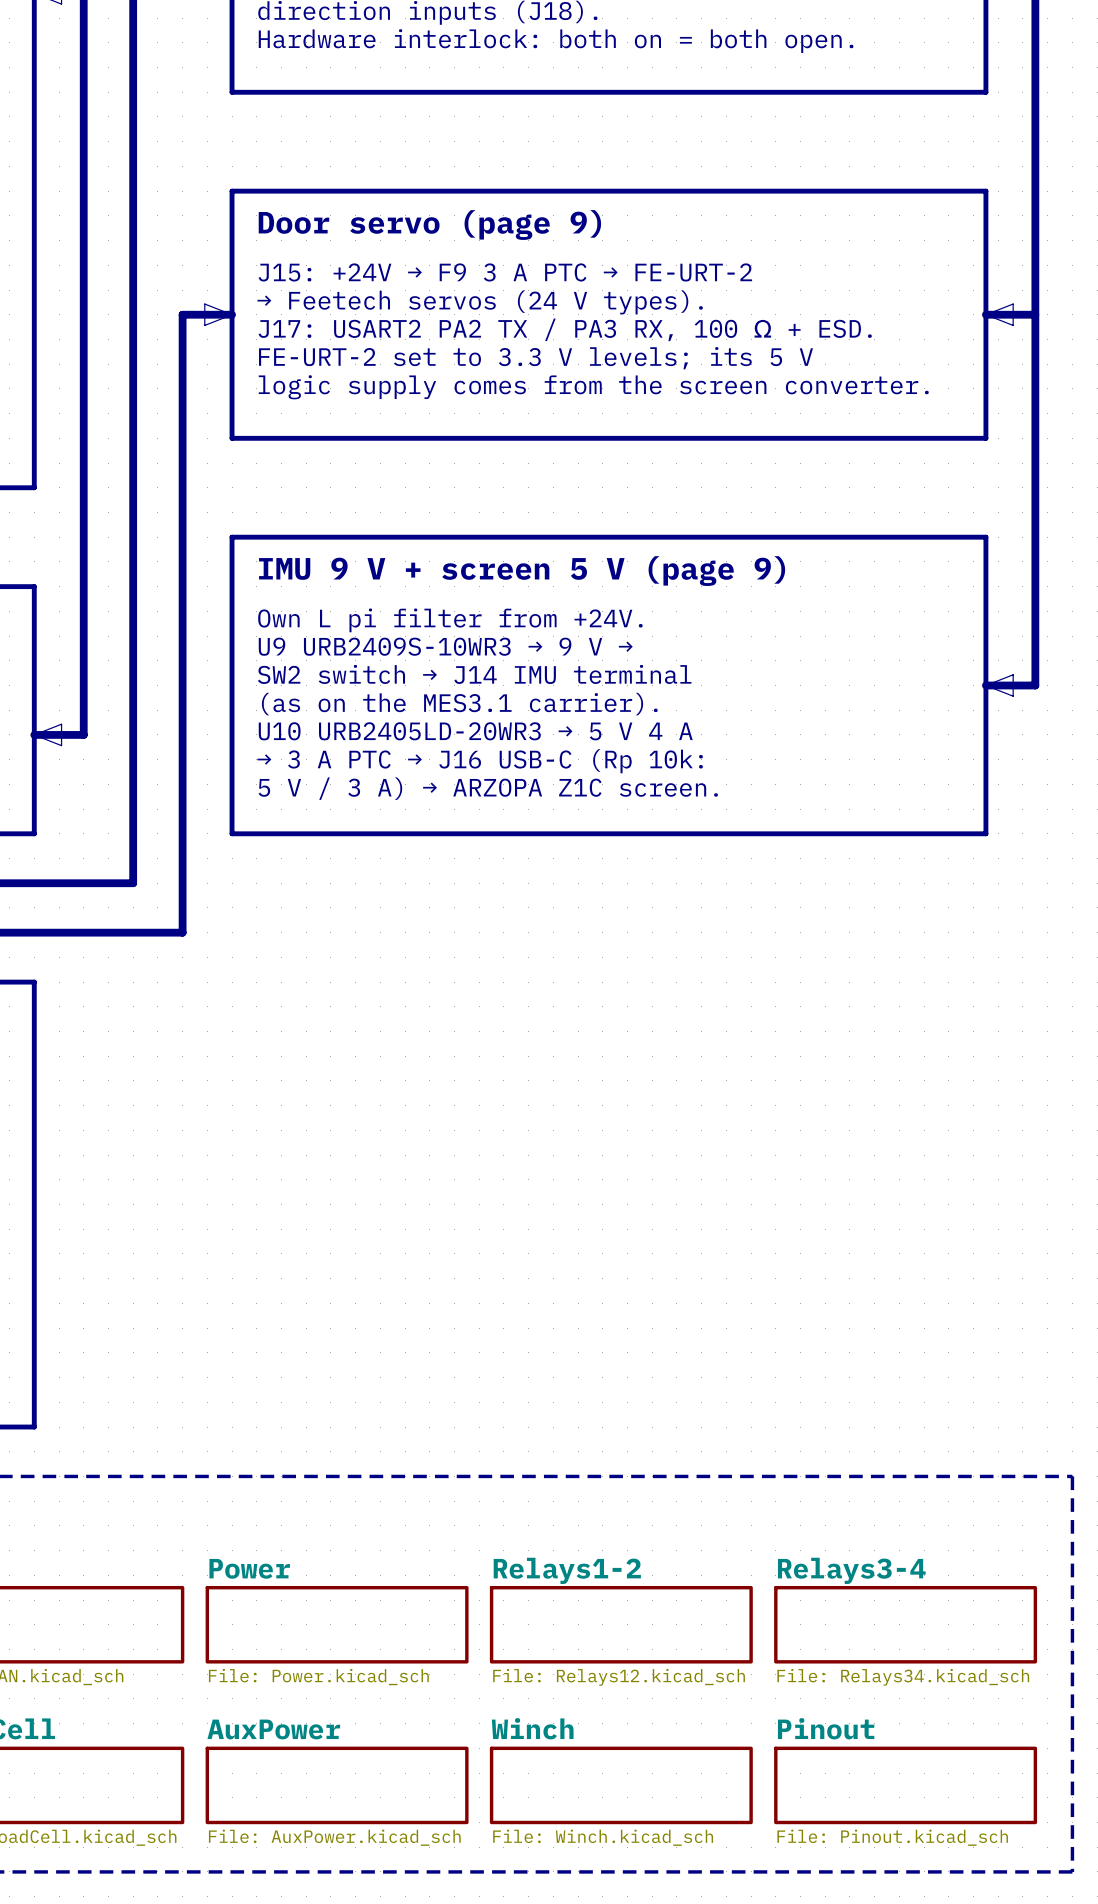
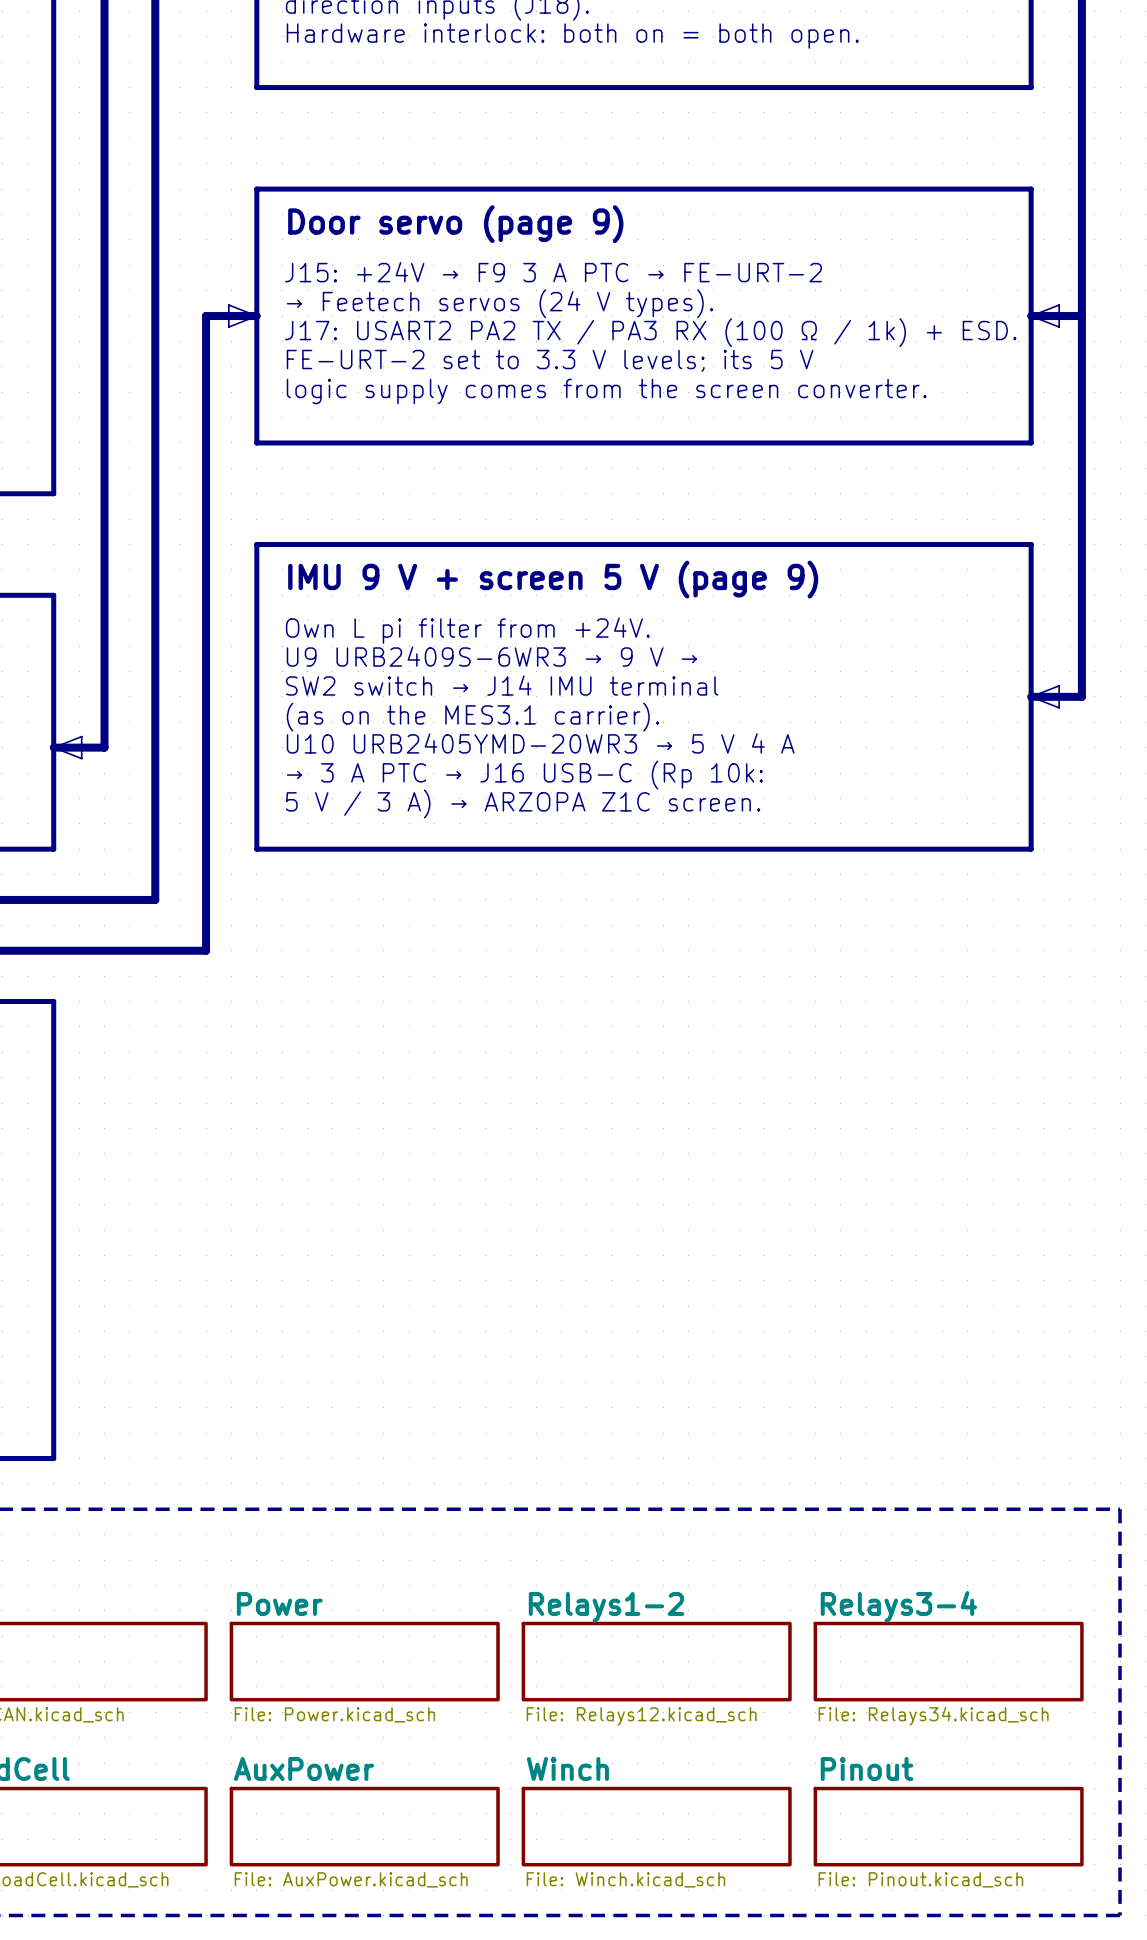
text: J17: USART2 PA2 TX / PA3 RX, 100 Ω + ESD. (565, 329) -> J17: USART2 PA2 TX / PA3 RX (100 Ω / 1k) + ESD. (650, 332)
text: U9 URB2409S-10WR3 → 9 V → (445, 646) -> U9 URB2409S-6WR3 → 9 V → (491, 656)
text: U10 URB2405LD-20WR3 → 5 V 4 A (475, 731) -> U10 URB2405YMD-20WR3 → 5 V 4 A (540, 743)

